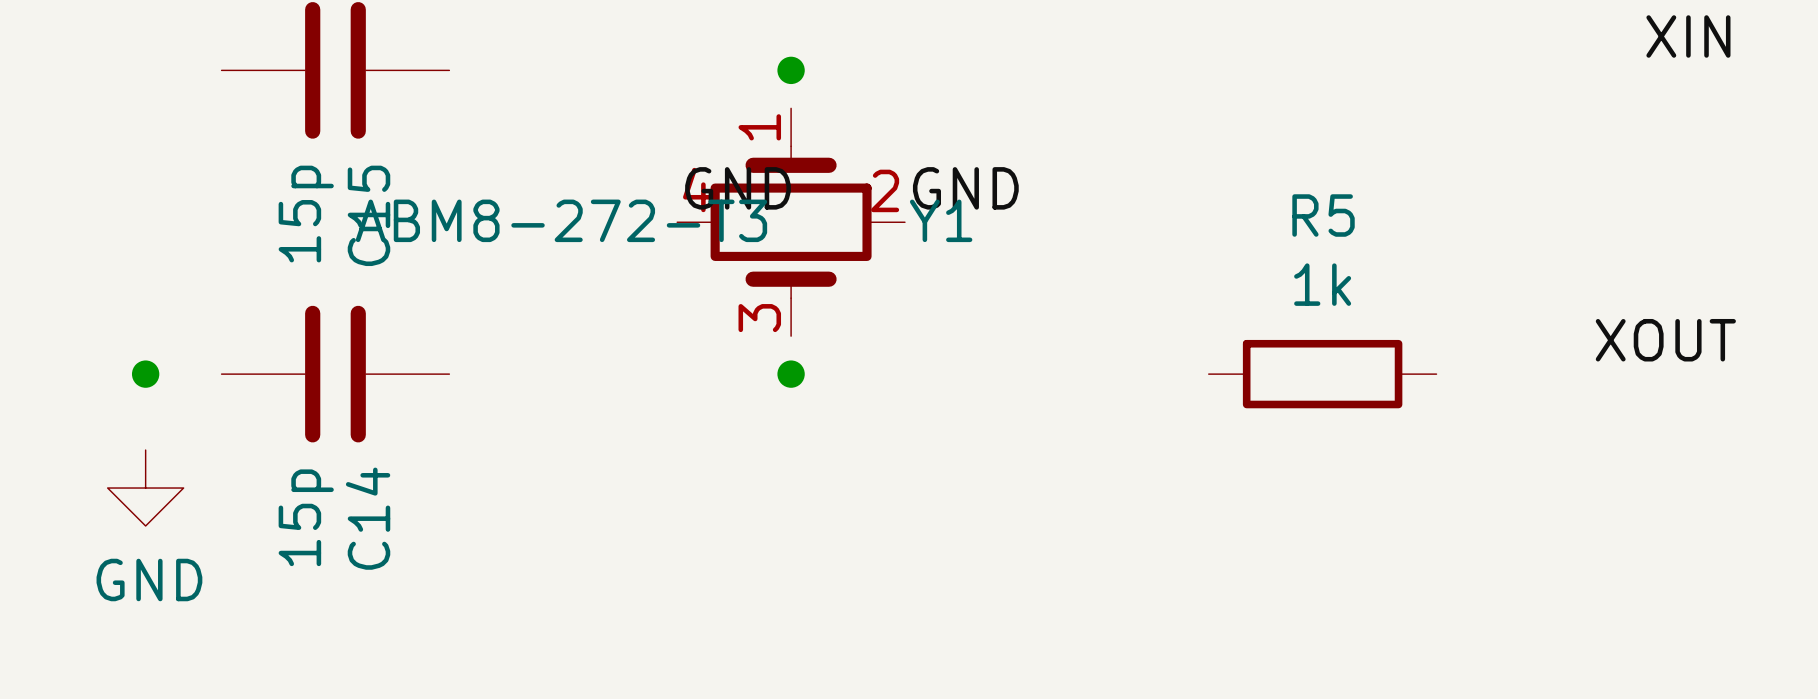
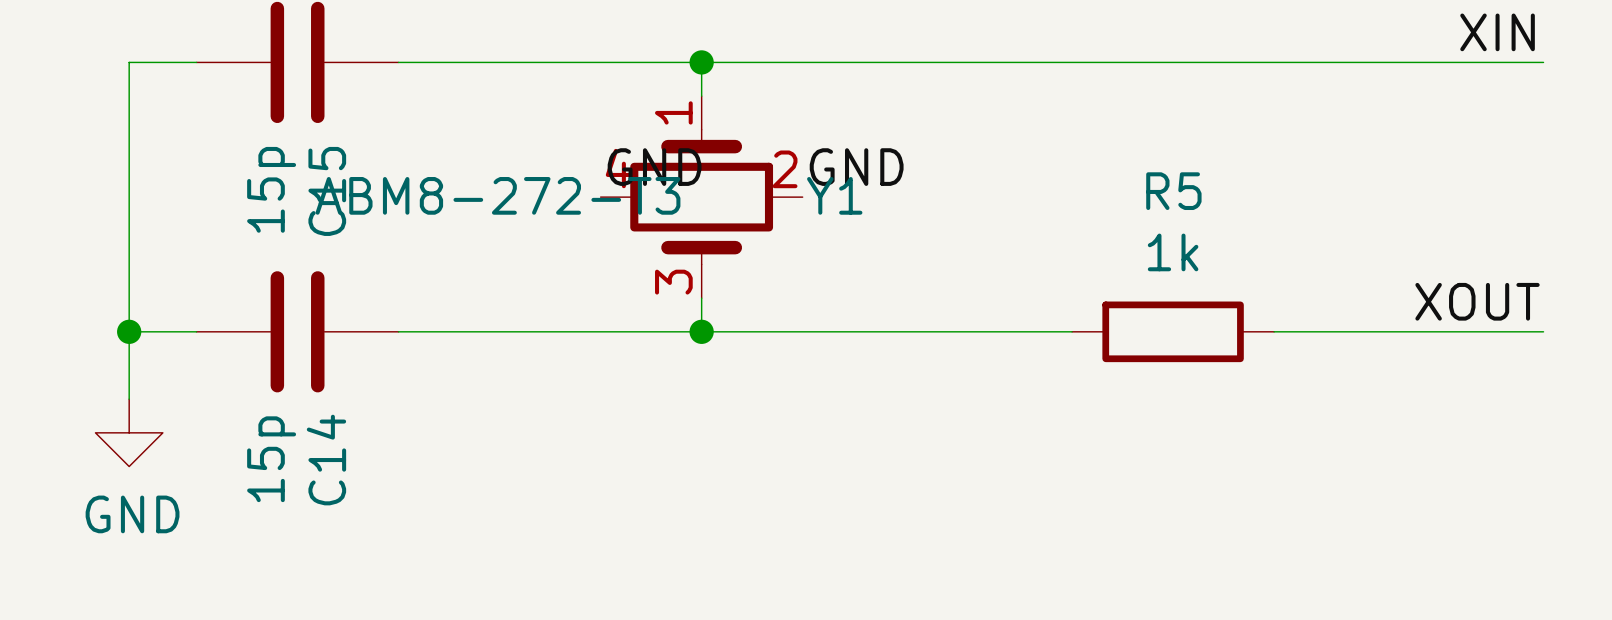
wire: none -> (196, 62) (129, 62) (129, 399)
wire: none -> (398, 62) (1543, 62)
wire: none -> (701, 62) (701, 96)
wire: none -> (701, 298) (701, 331)
wire: none -> (129, 331) (196, 331)
wire: none -> (398, 331) (1072, 331)
wire: none -> (1274, 331) (1543, 331)

